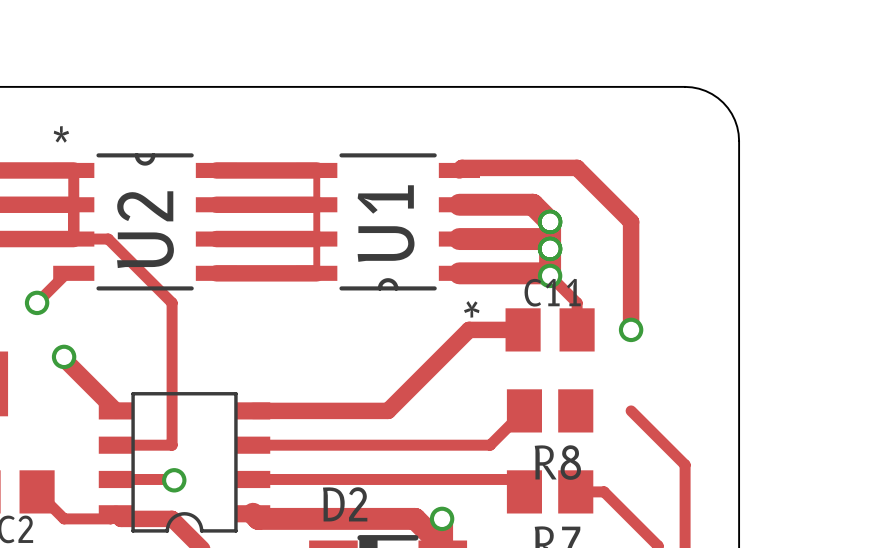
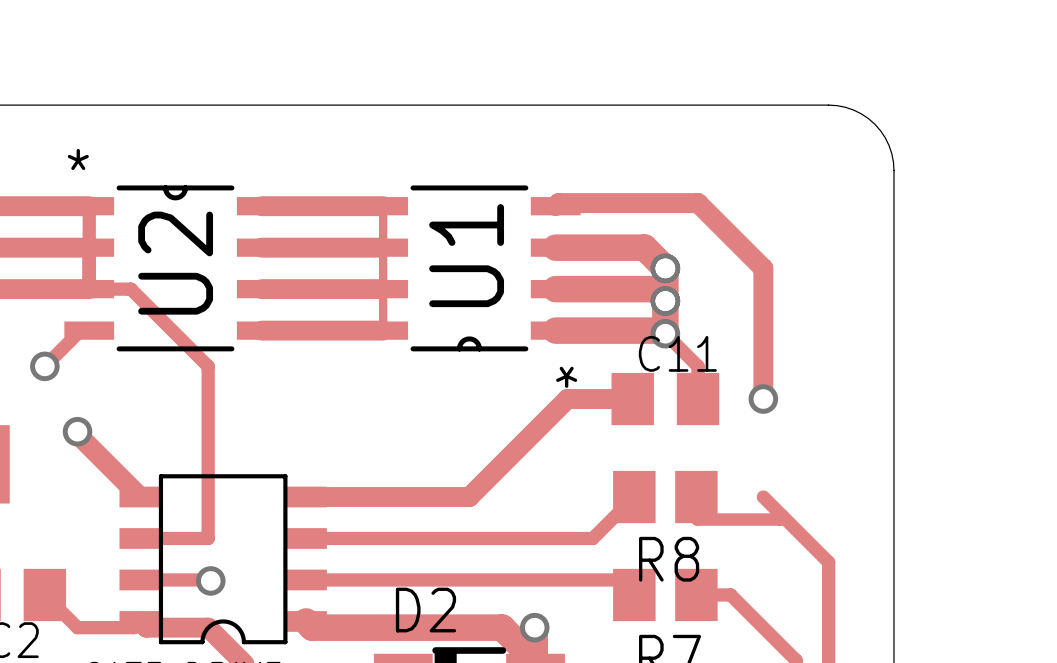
track: none -> (696, 497) (697, 519) (780, 519) (783, 516)

